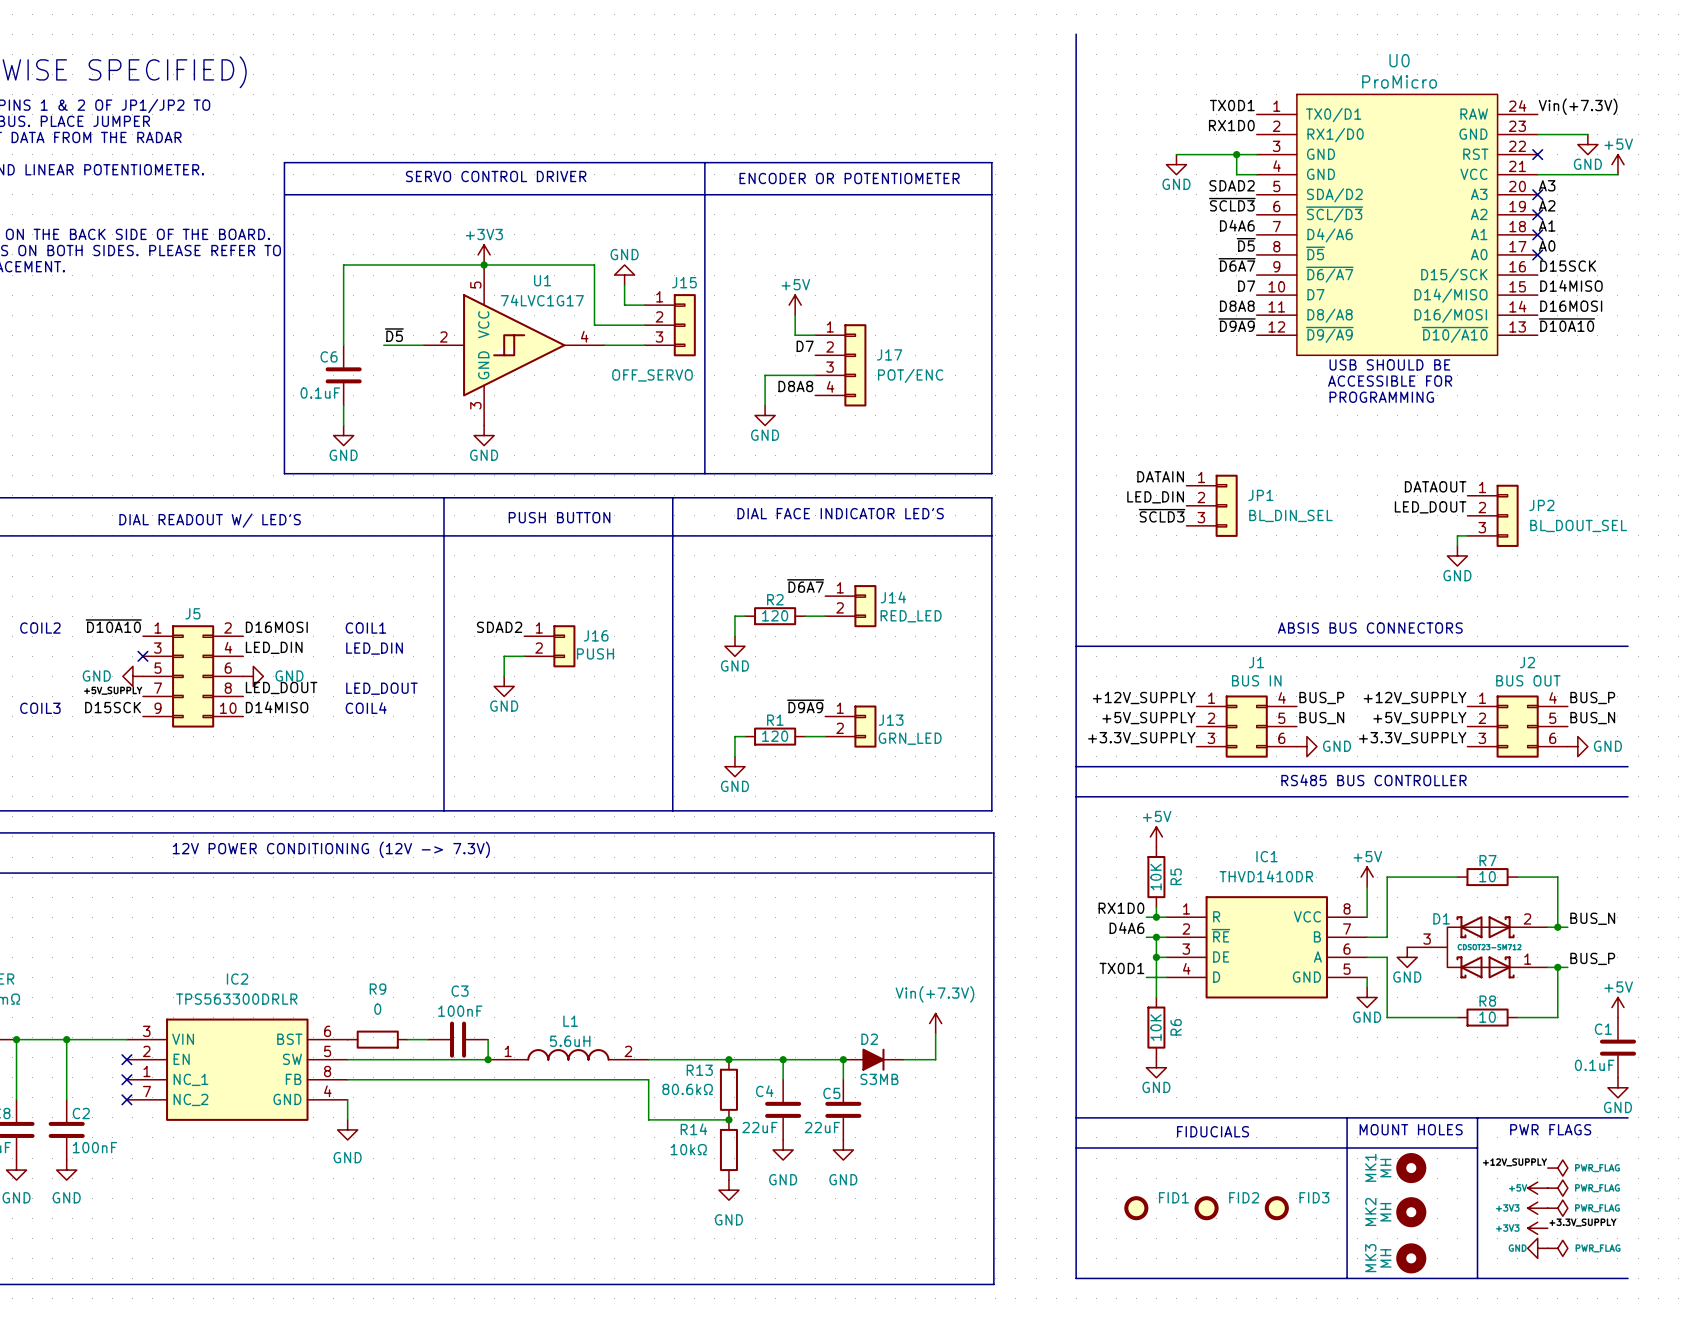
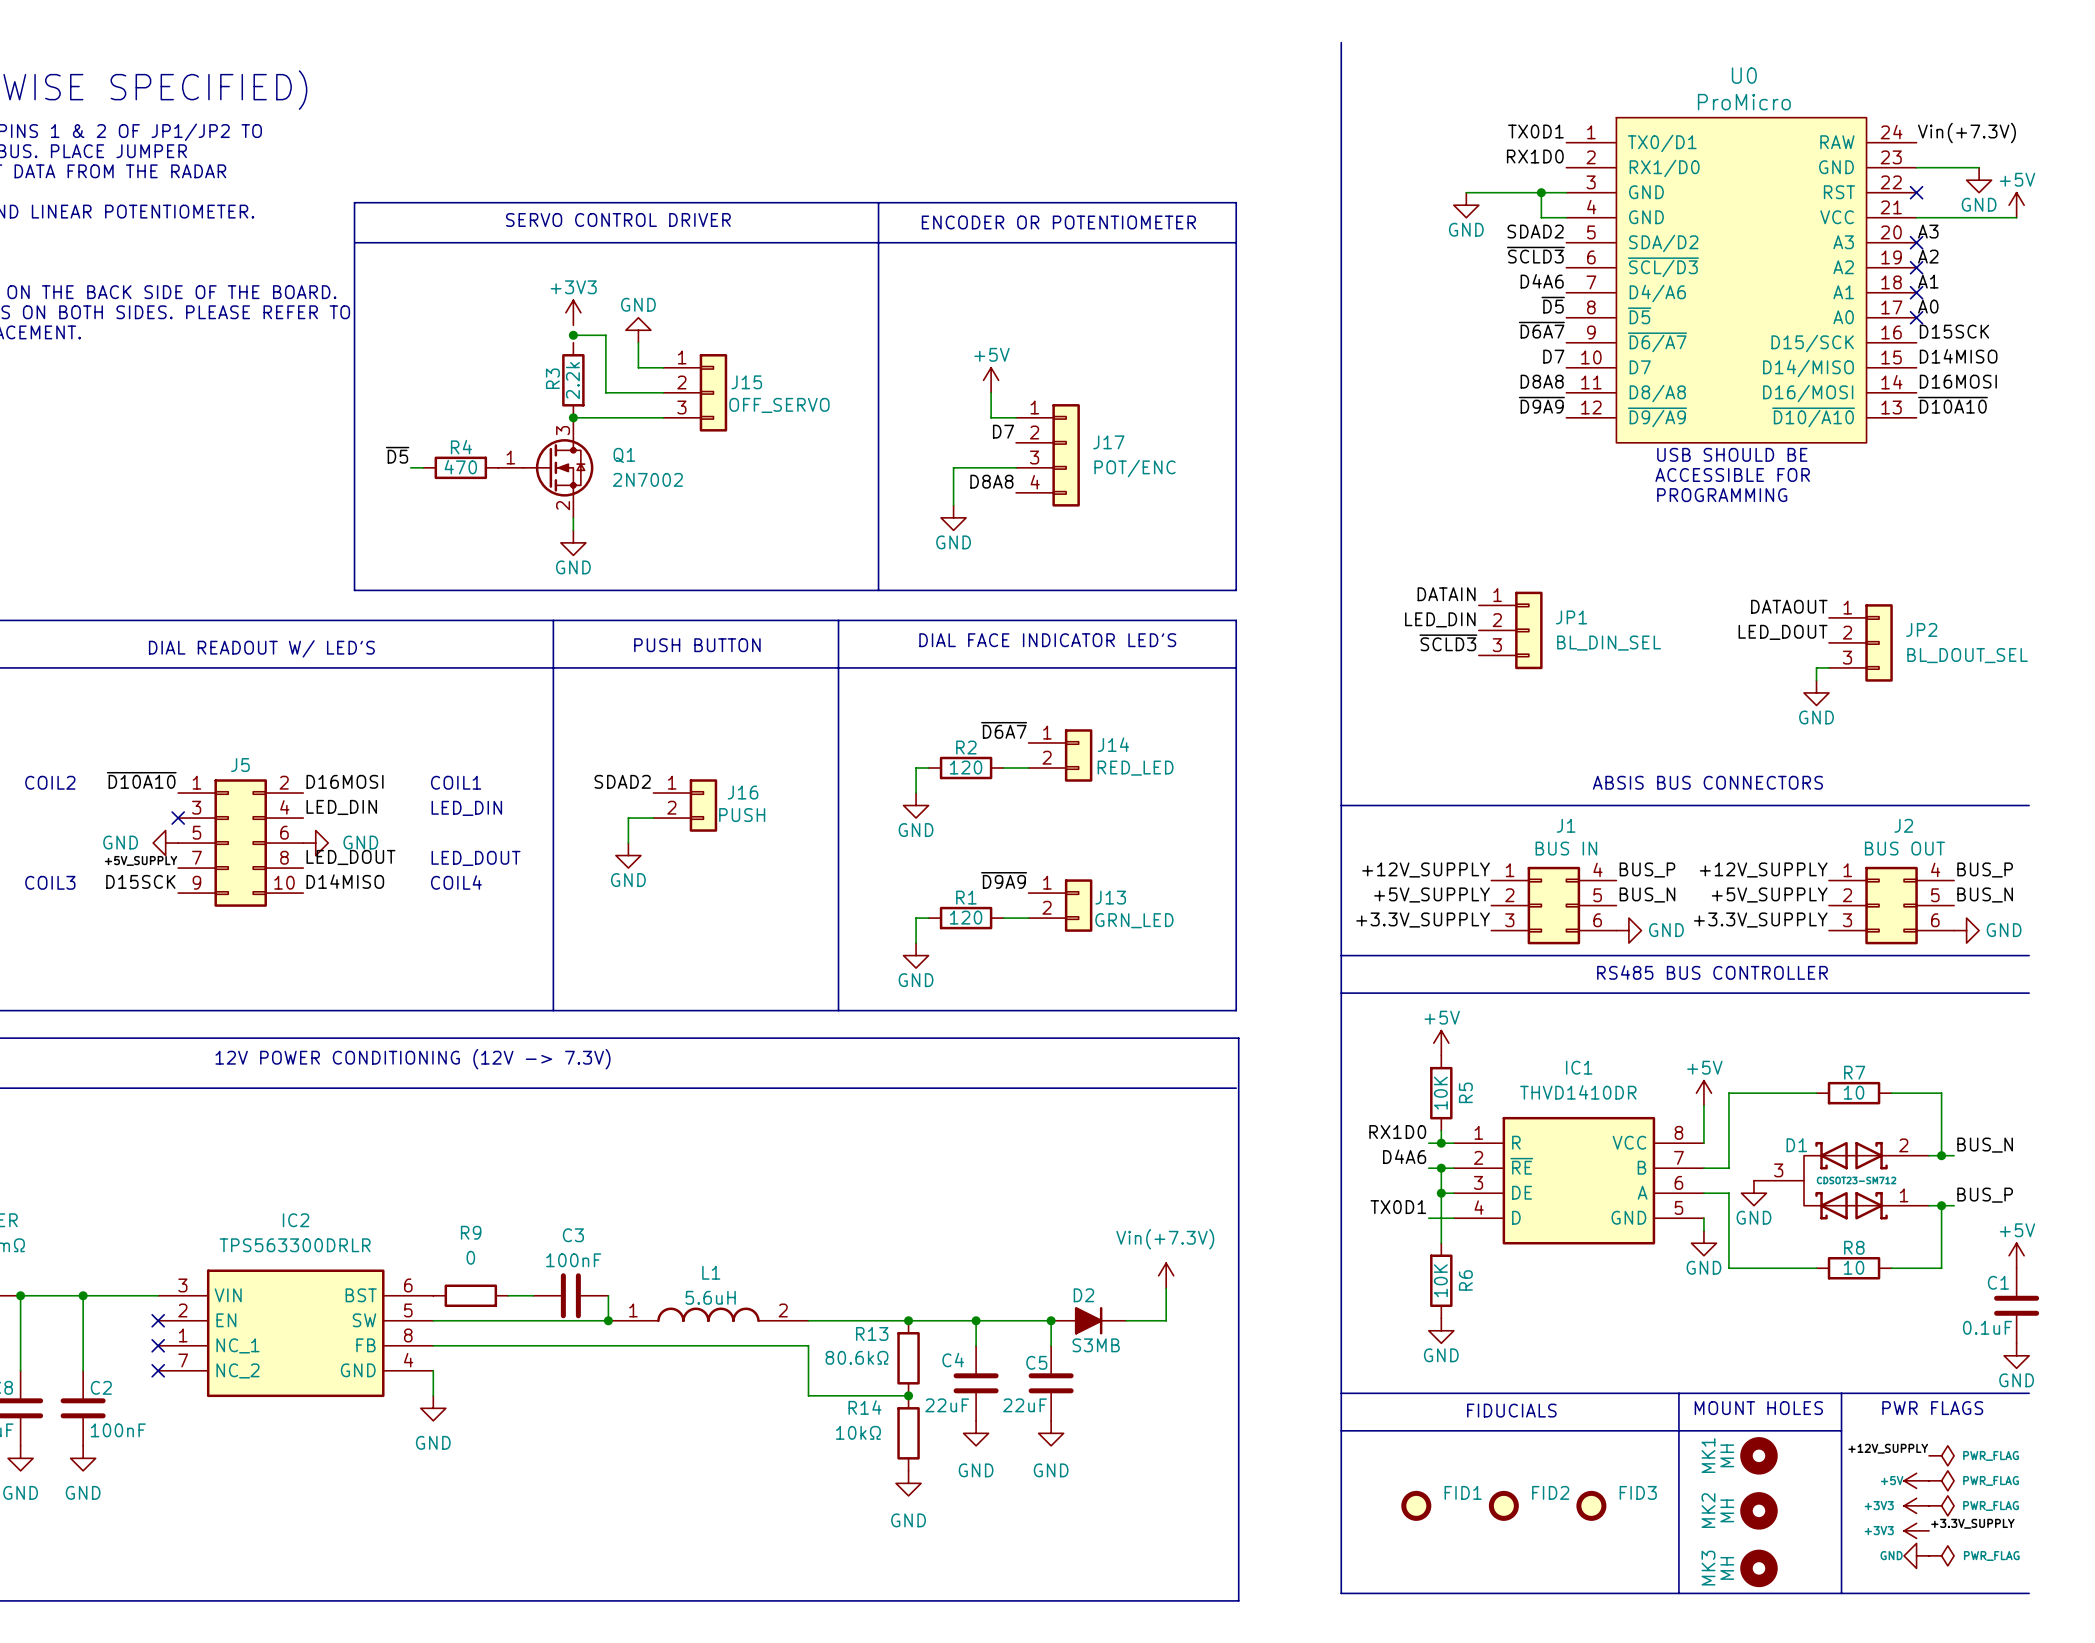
power symbol position: +3V3 (484, 254) -> +3V3 (573, 312)
junction position: (484, 264) -> (573, 335)
power symbol: none -> GND (638, 330)
wire: none -> (573, 335) (605, 335) (605, 392) (663, 392)
power symbol: GND (624, 275) -> none
J15 name position: J15 (684, 282) -> J15 (746, 382)
wire: (624, 285) (624, 305) (644, 305) -> (638, 342) (638, 367) (663, 367)
R3: none -> 2.2k (573, 380)
wire: (644, 325) (594, 325) (594, 264) (343, 264) (343, 345) -> none
J15 position: (670, 325) -> (695, 392)
label position: ~{D5} (394, 335) -> ~{D5} (397, 455)
junction: none -> (573, 417)
wire: (383, 345) (423, 345) -> none
U1: 74LVC1G17 (514, 345) -> none
wire: (604, 345) (644, 345) -> none
wire: none -> (410, 467) (423, 467)
C6: 0.1uF (343, 375) -> none
R4: none -> 470 (460, 467)
Q1: none -> 2N7002 (545, 467)
J15 value position: OFF_SERVO (652, 375) -> OFF_SERVO (779, 405)
wire: (343, 405) (343, 425) -> none
wire: none -> (573, 517) (573, 530)
power symbol: GND (343, 435) -> none
power symbol position: GND (484, 435) -> GND (573, 542)

